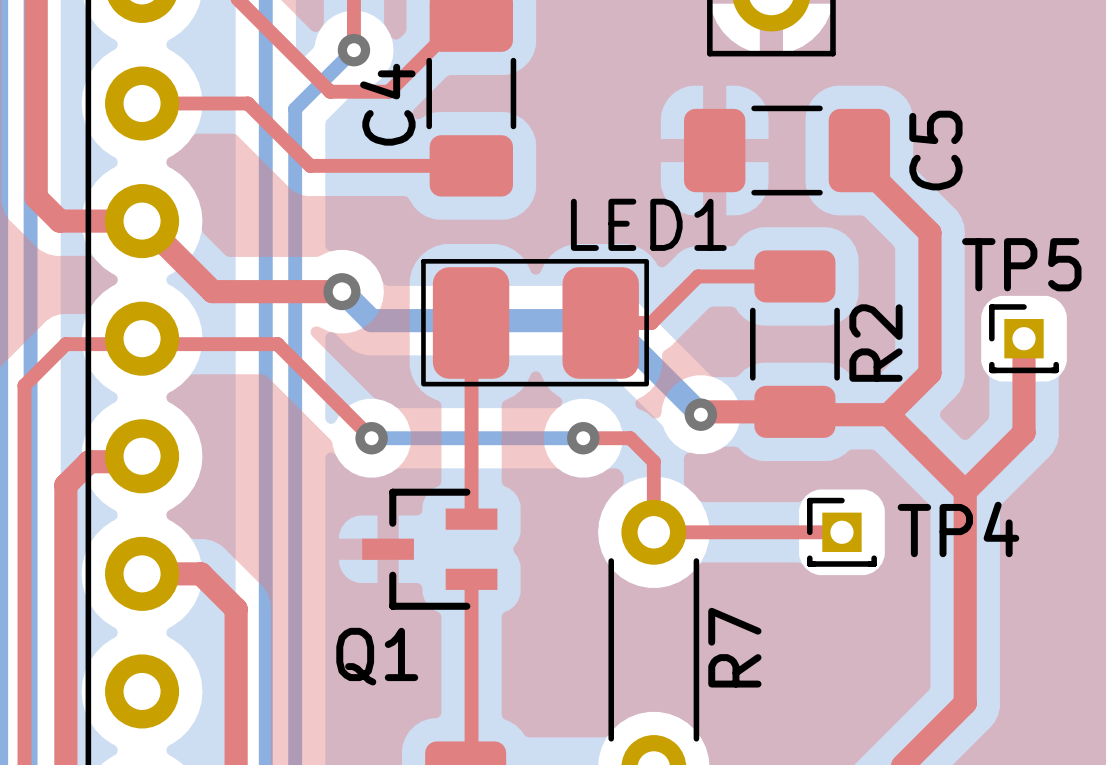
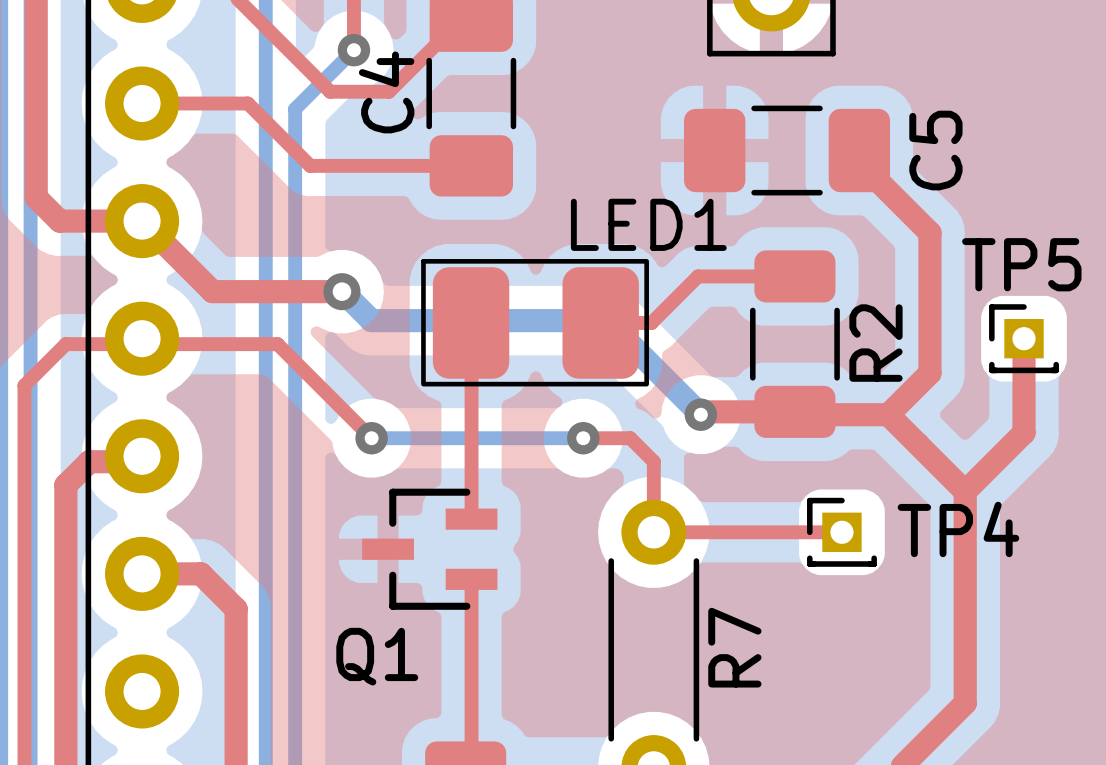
C4 name position: C4 (387, 104) -> C4 (386, 92)

